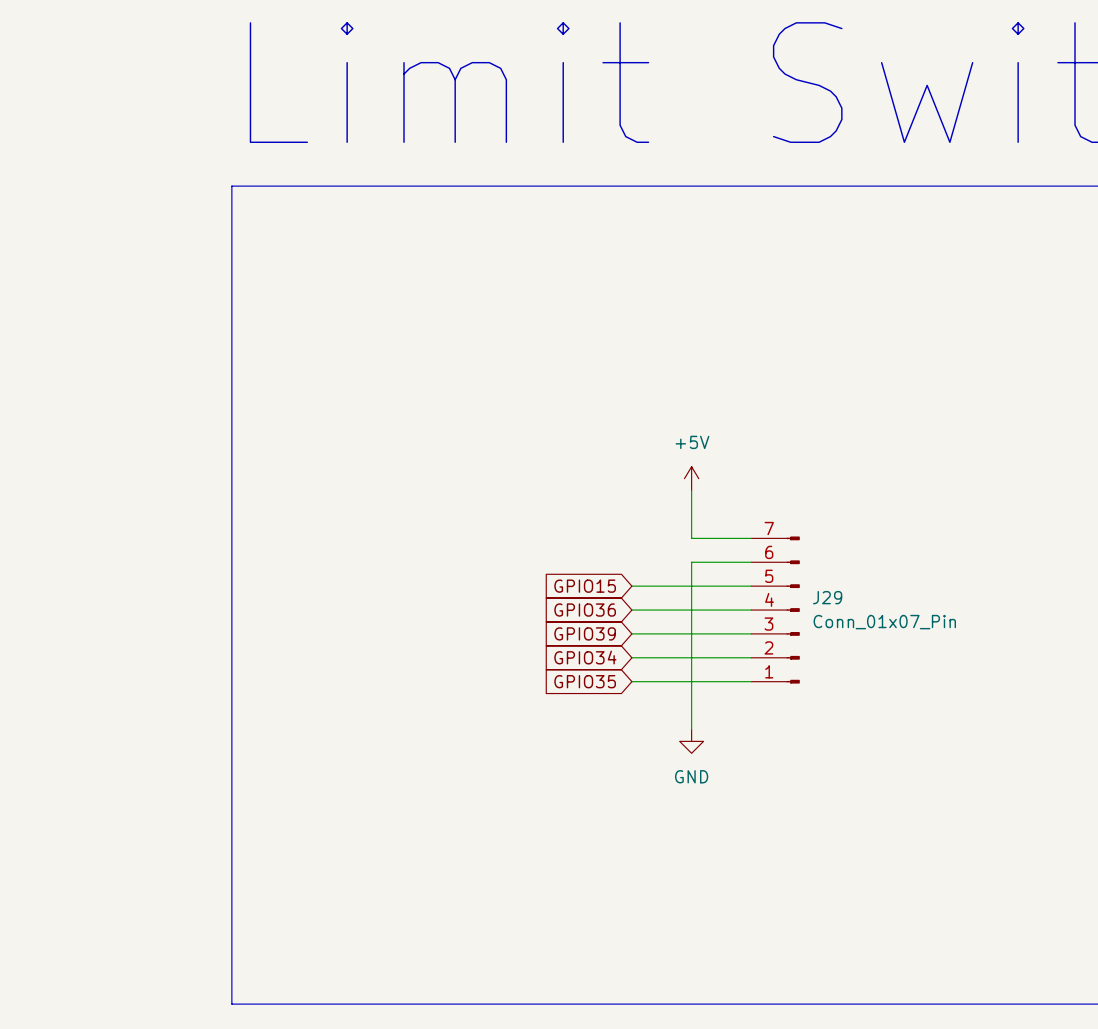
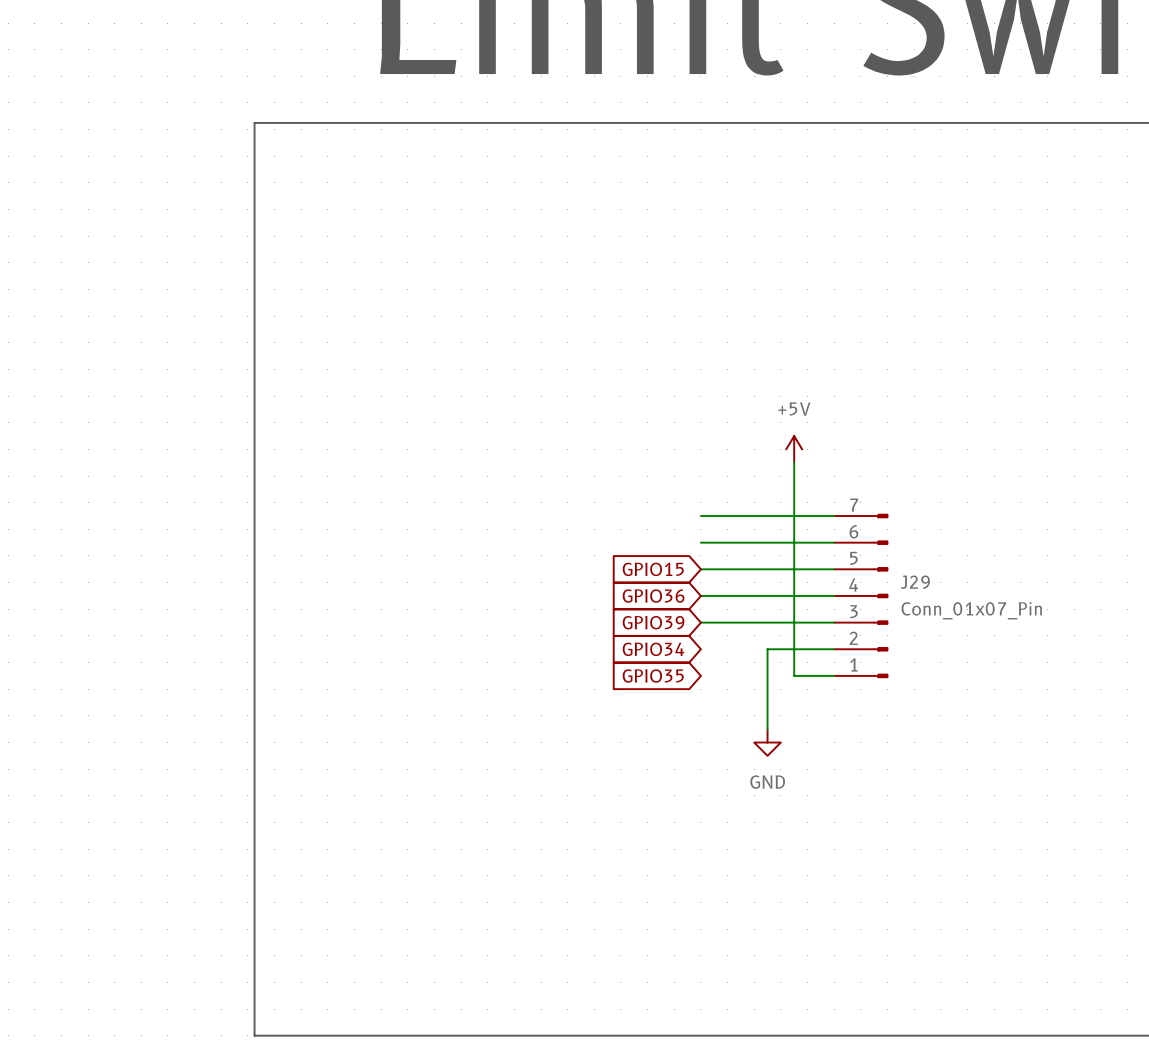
power symbol position: +5V (691, 478) -> +5V (794, 449)
wire: (691, 490) (691, 538) -> (700, 516) (767, 516)
wire: (691, 562) (691, 657) (631, 657) -> (767, 542) (700, 542)
wire: (631, 681) (715, 681) -> (794, 462) (794, 675)

